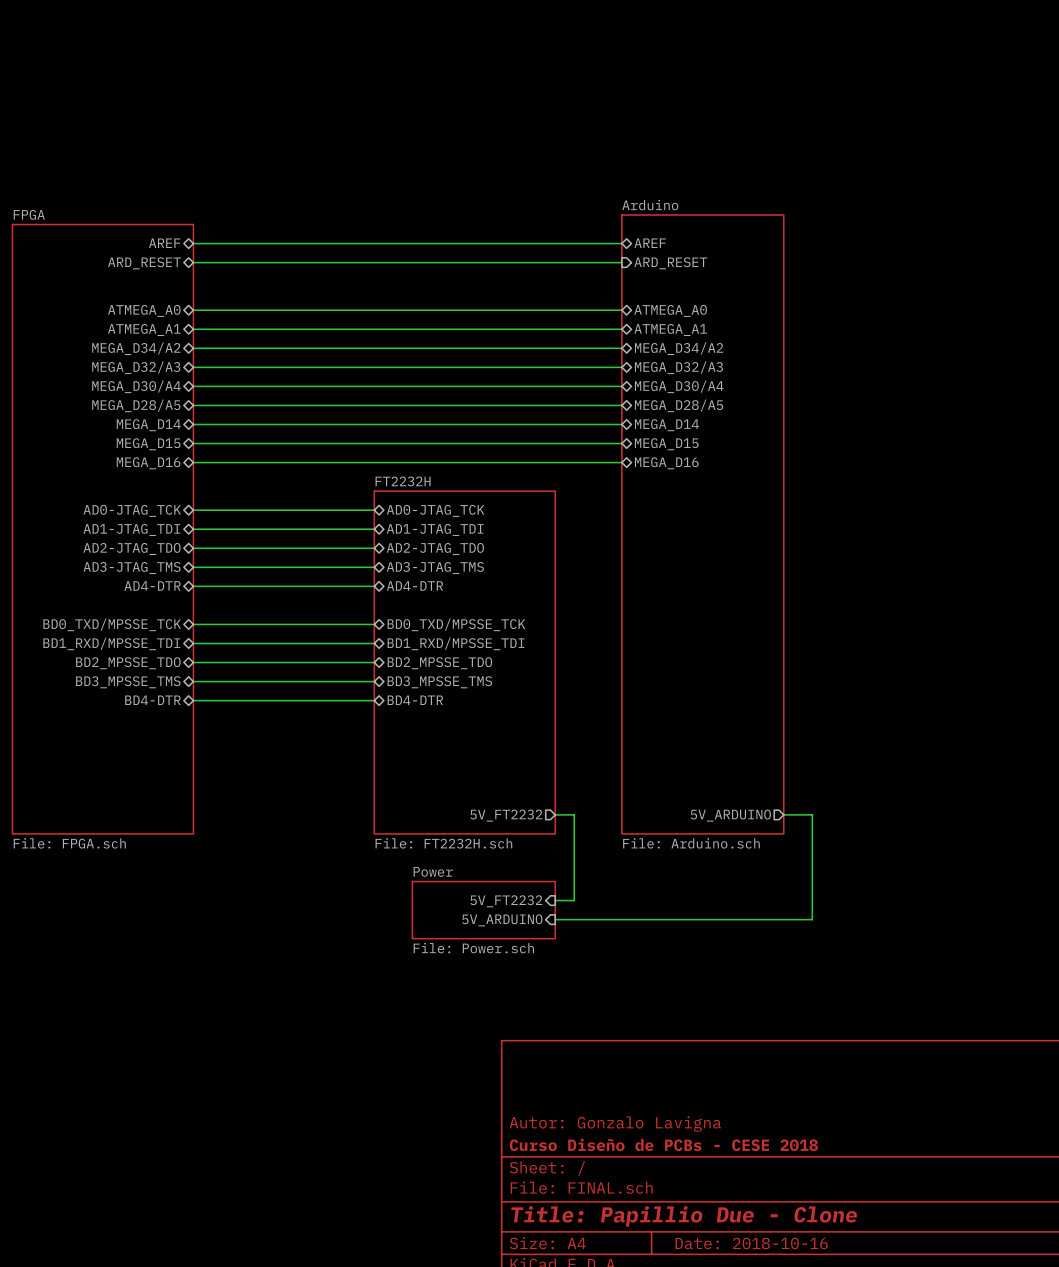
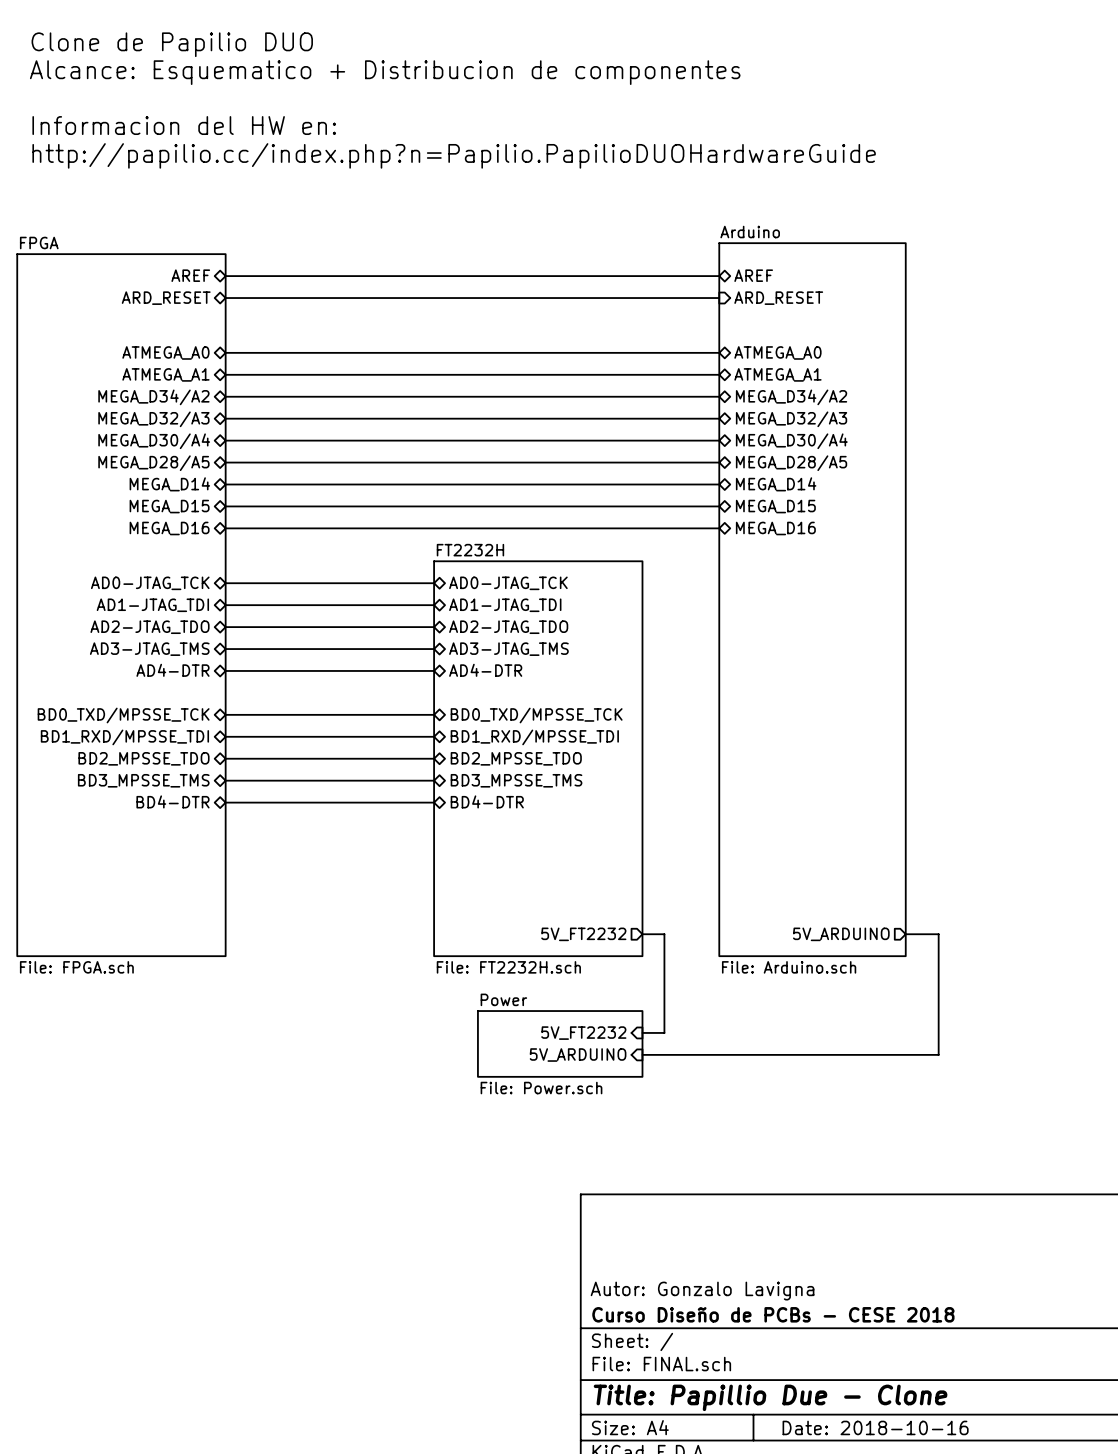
text: none -> Clone de Papilio DUO (172, 44)
text: none -> Alcance: Esquematico + Distribucion de componentes (385, 72)
text: none -> Informacion del HW en: (184, 125)
text: none -> http://papilio.cc/index.php?n=Papilio.PapilioDUOHardwareGuide (454, 155)

